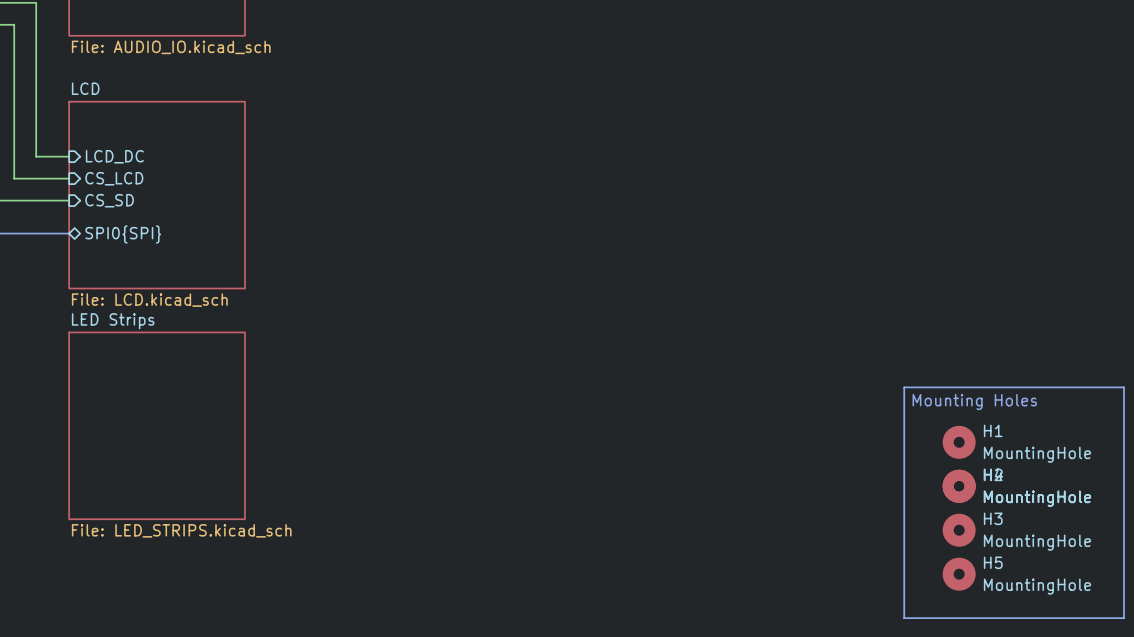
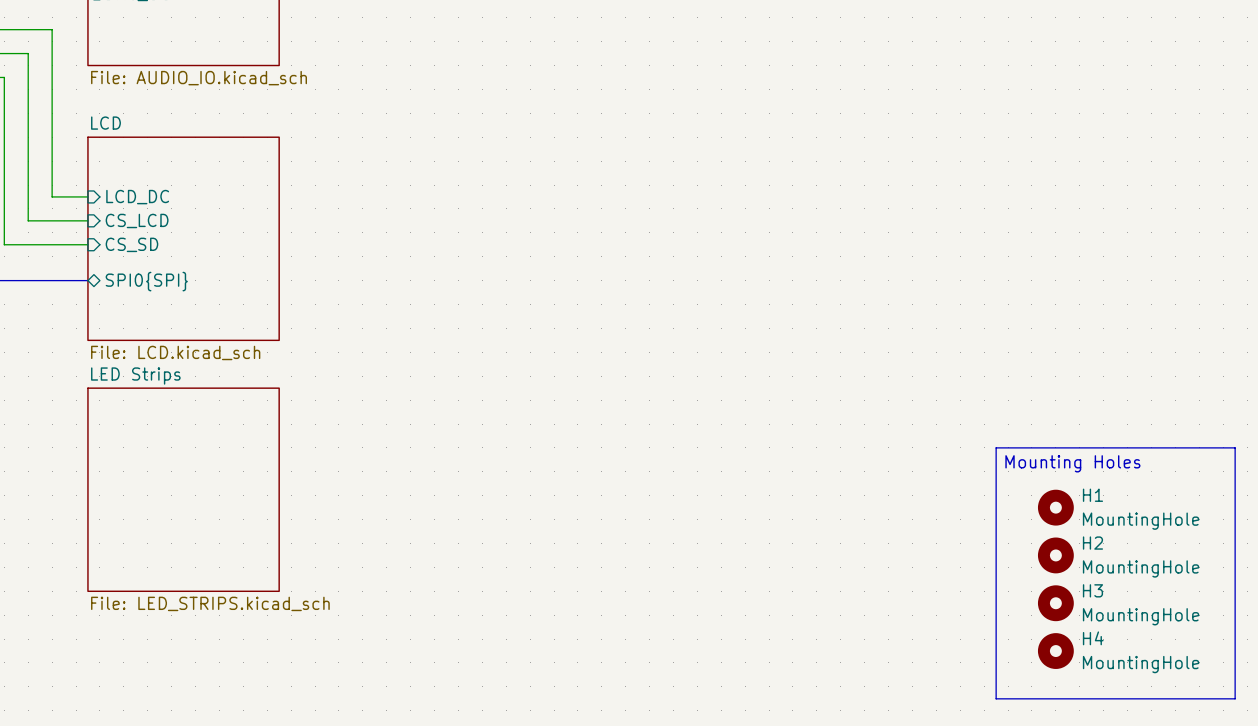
part: MountingHole (959, 486) -> none
H5 name: H5 (993, 562) -> H4 (1093, 638)

